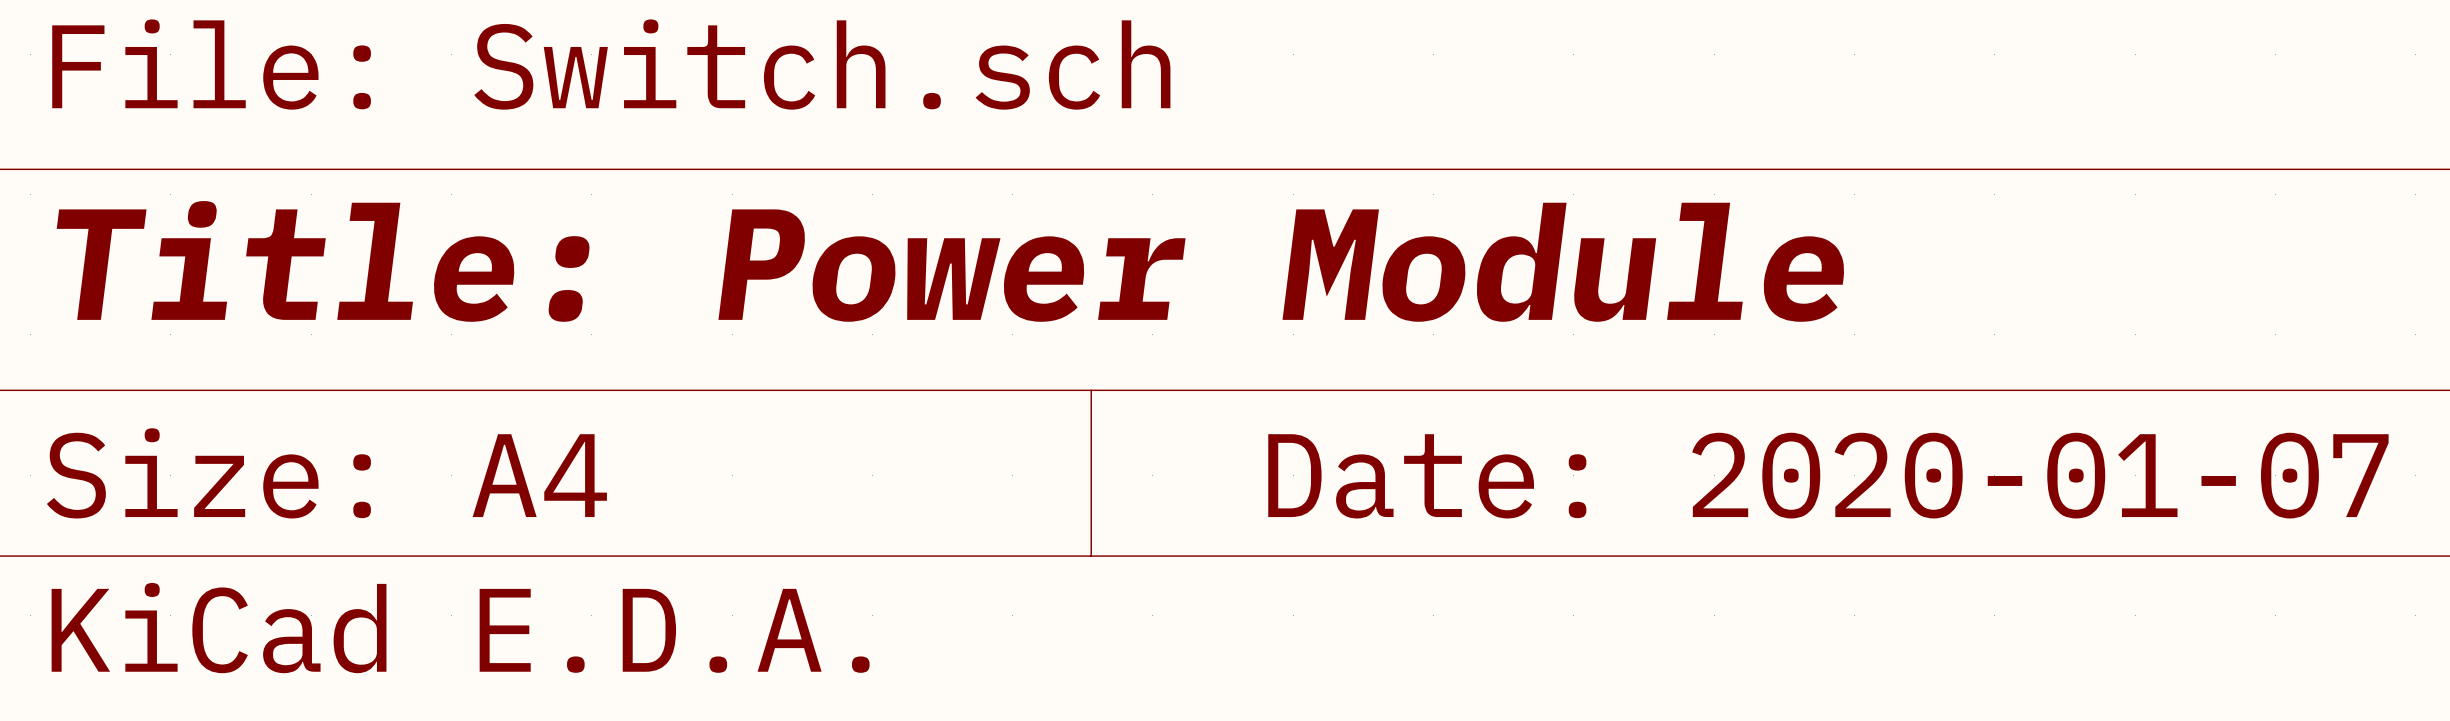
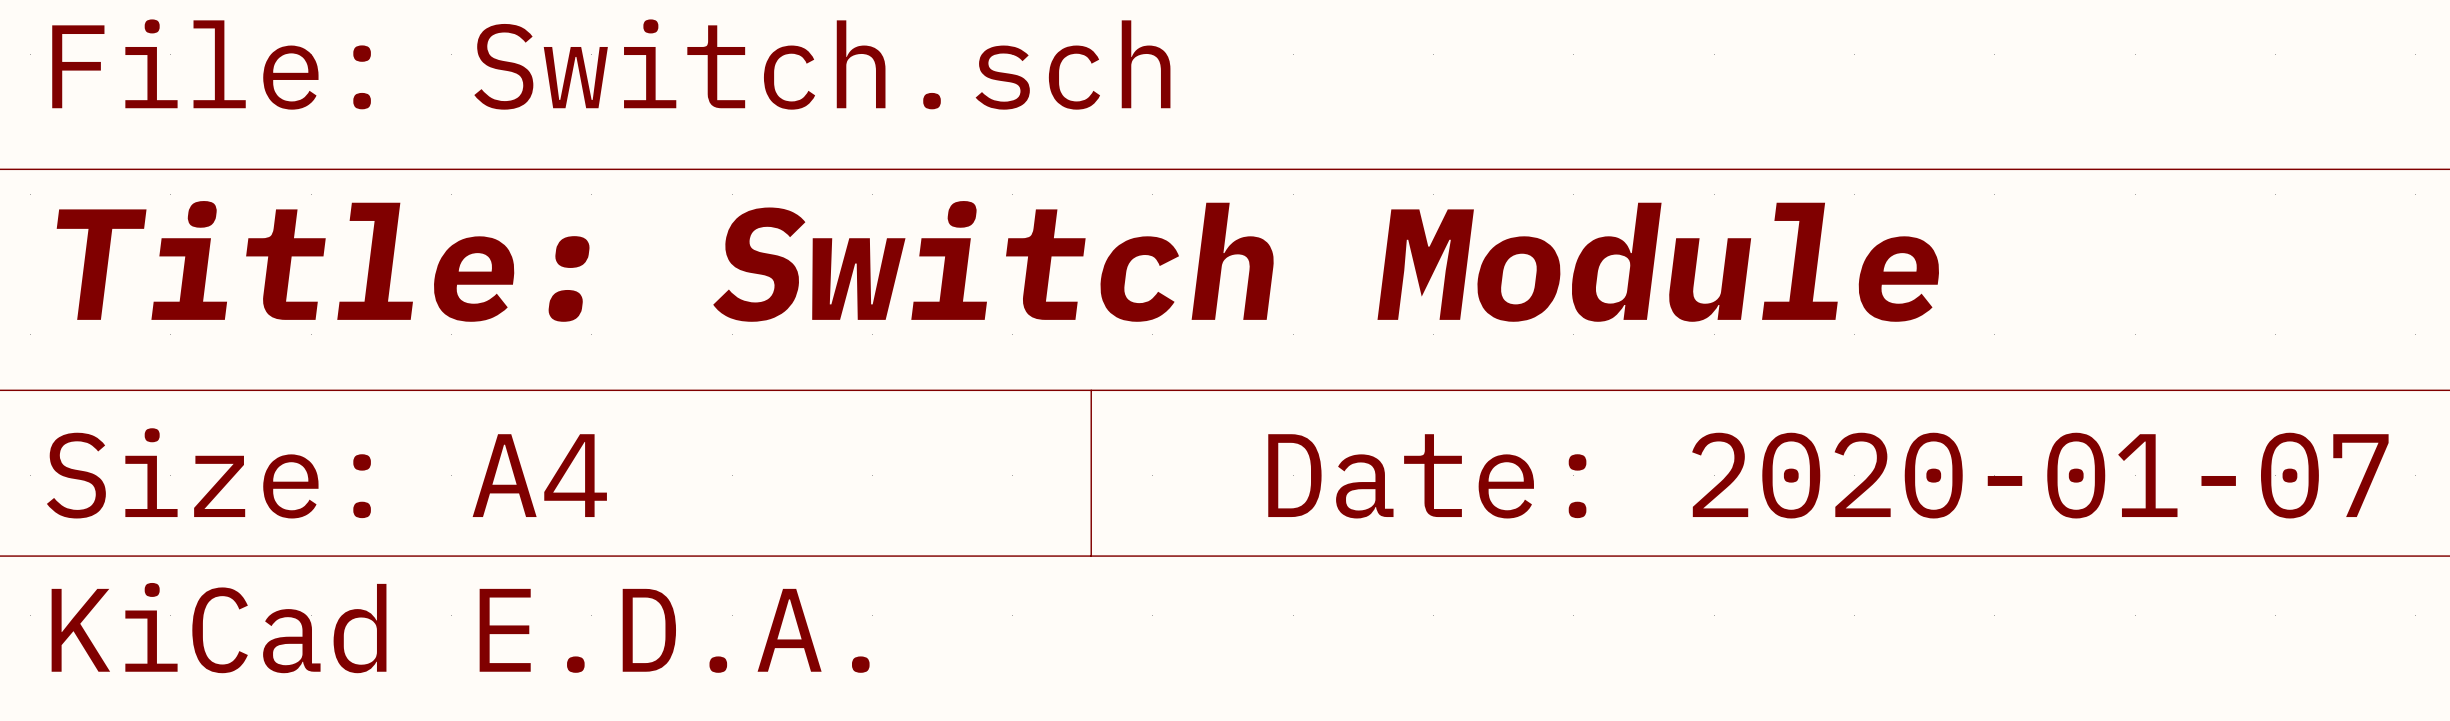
title block: Title: Power Module (950, 261) -> Title: Switch Module (998, 261)

